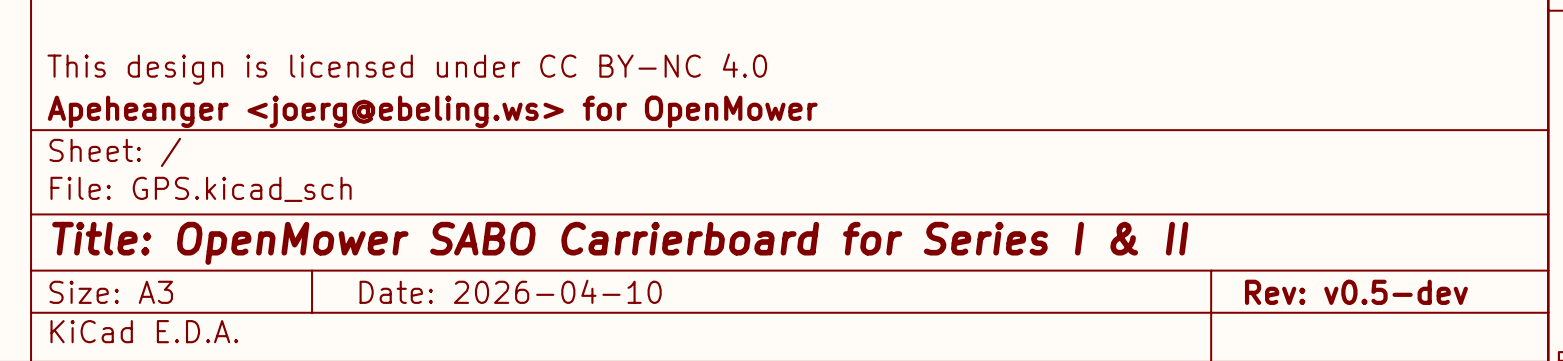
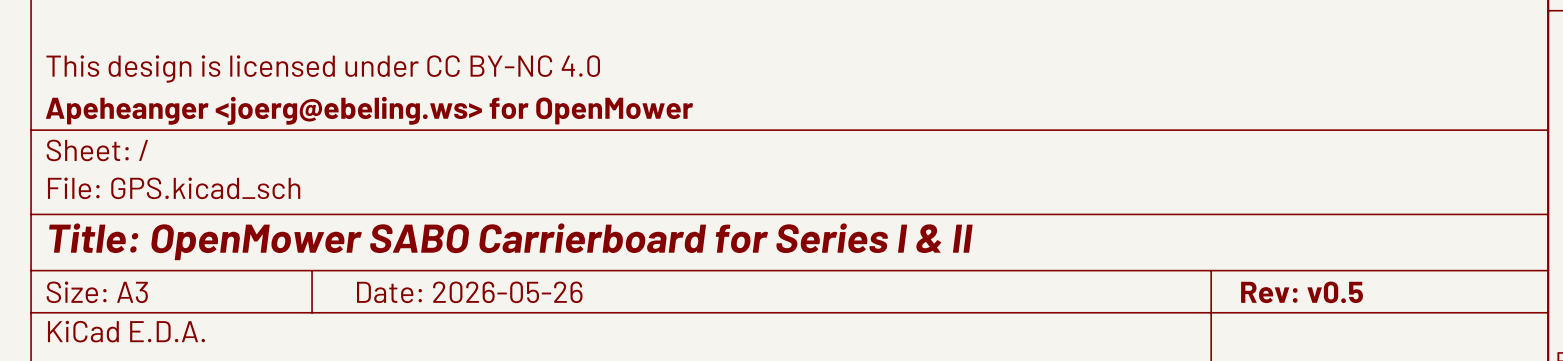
title block: Date: 2026-04-10 (510, 291) -> Date: 2026-05-26 (469, 292)
title block: Rev: v0.5-dev (1356, 292) -> Rev: v0.5 (1302, 292)

